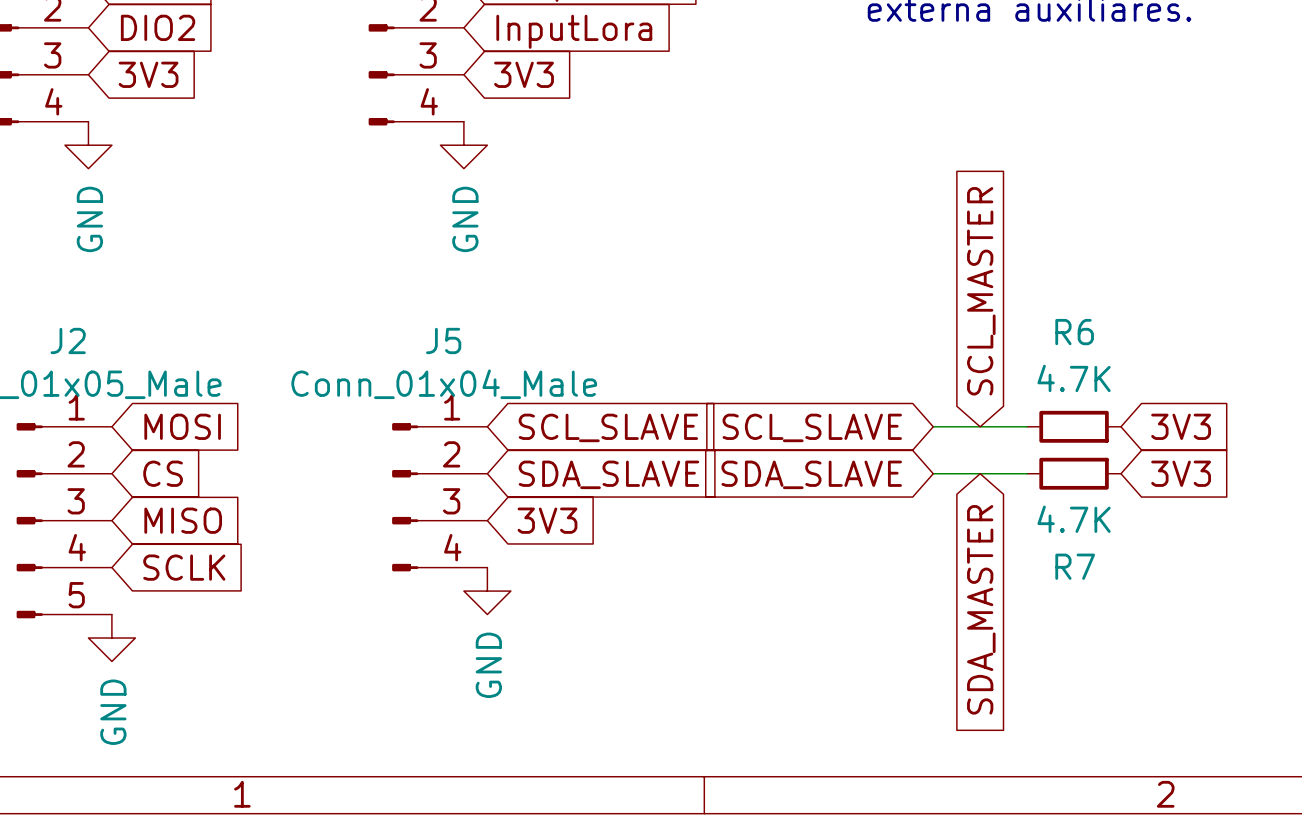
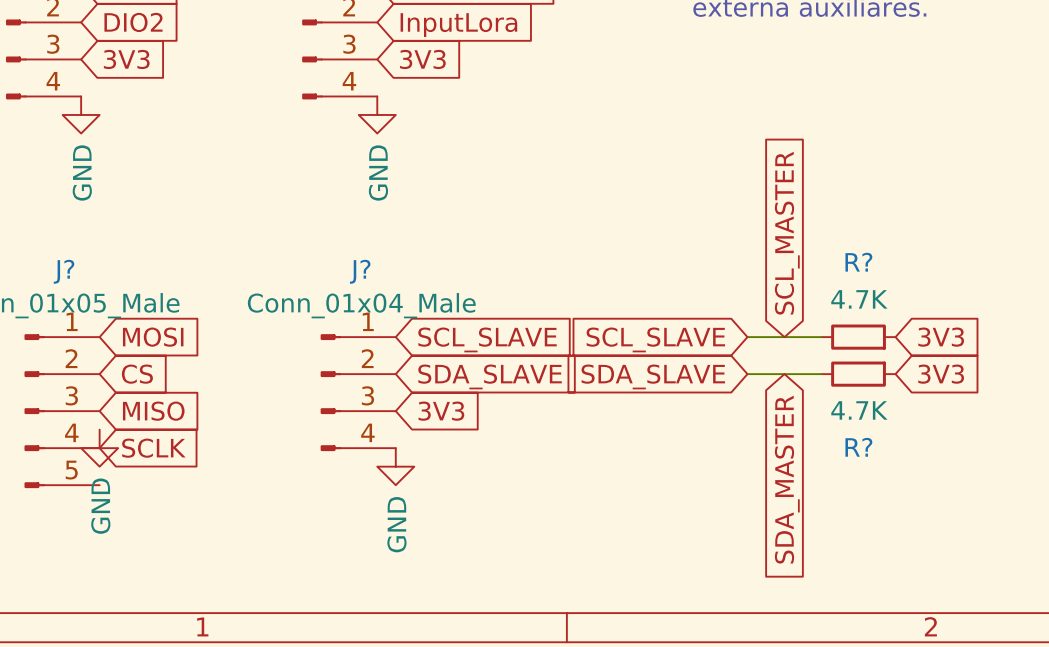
R6 name: R6 (1074, 332) -> R? (858, 262)
J2 name: J2 (68, 340) -> J? (64, 271)
J5 name: J5 (443, 340) -> J? (360, 271)
R7 name: R7 (1075, 566) -> R? (858, 447)
power symbol position: GND (111, 638) -> GND (99, 448)

